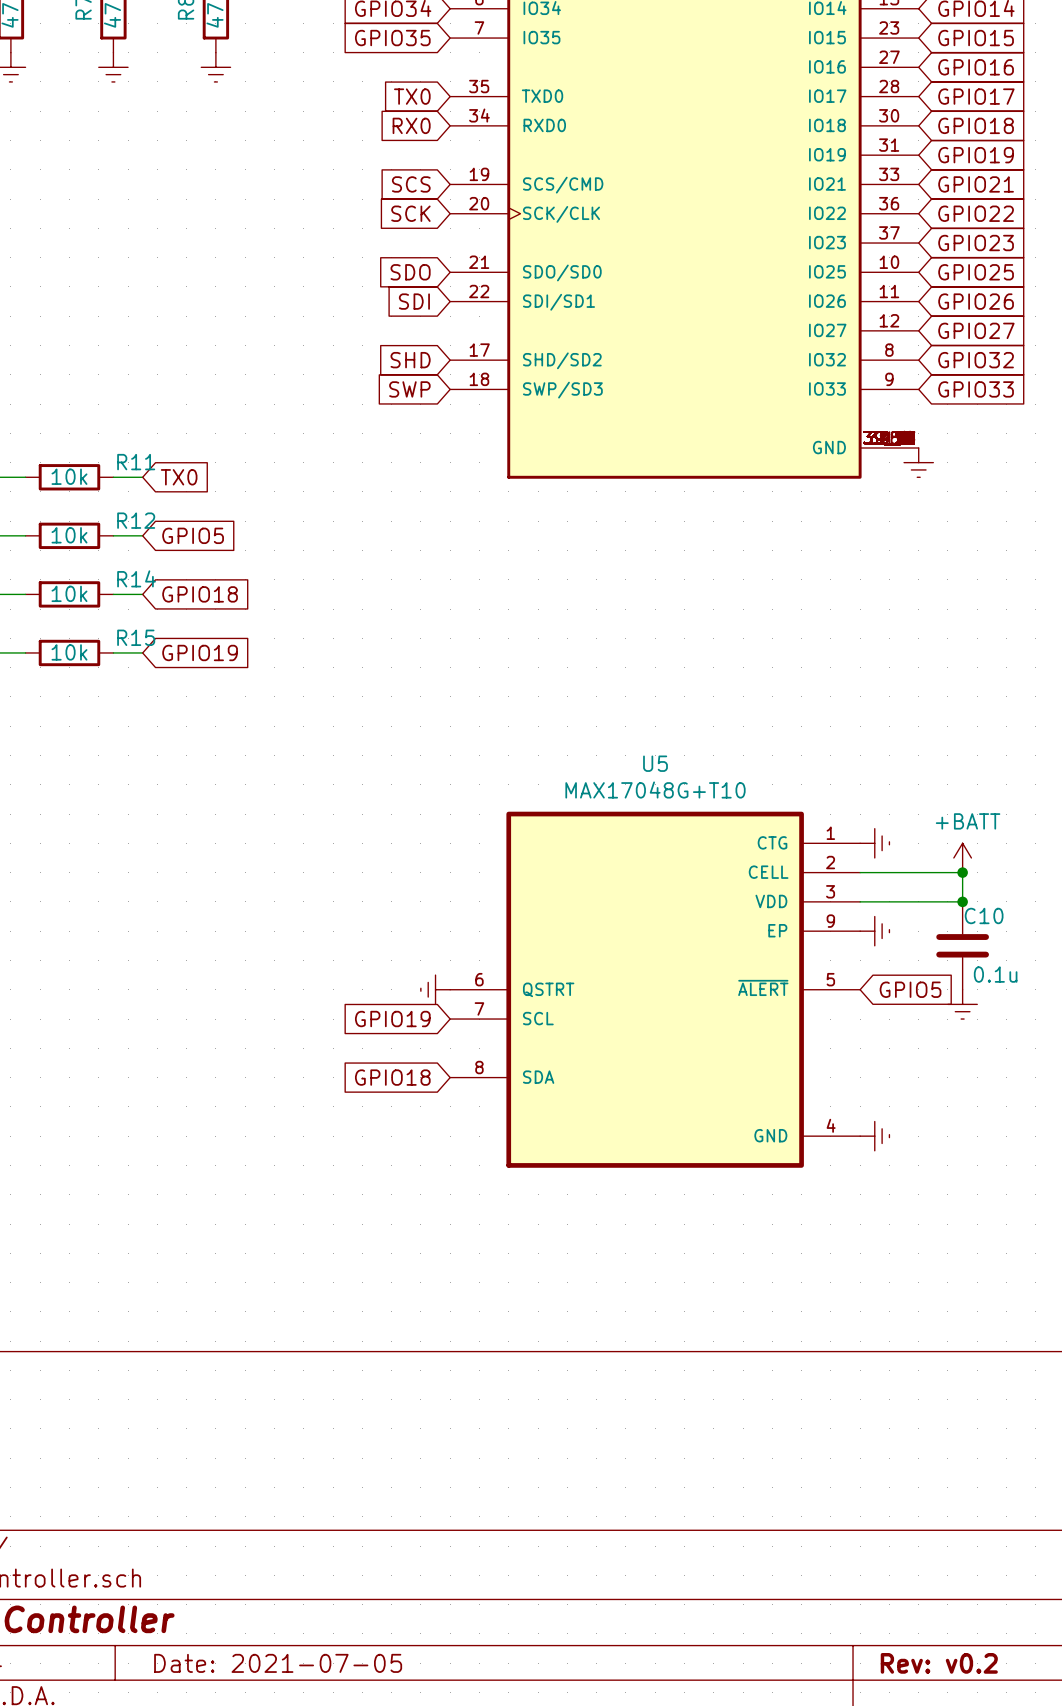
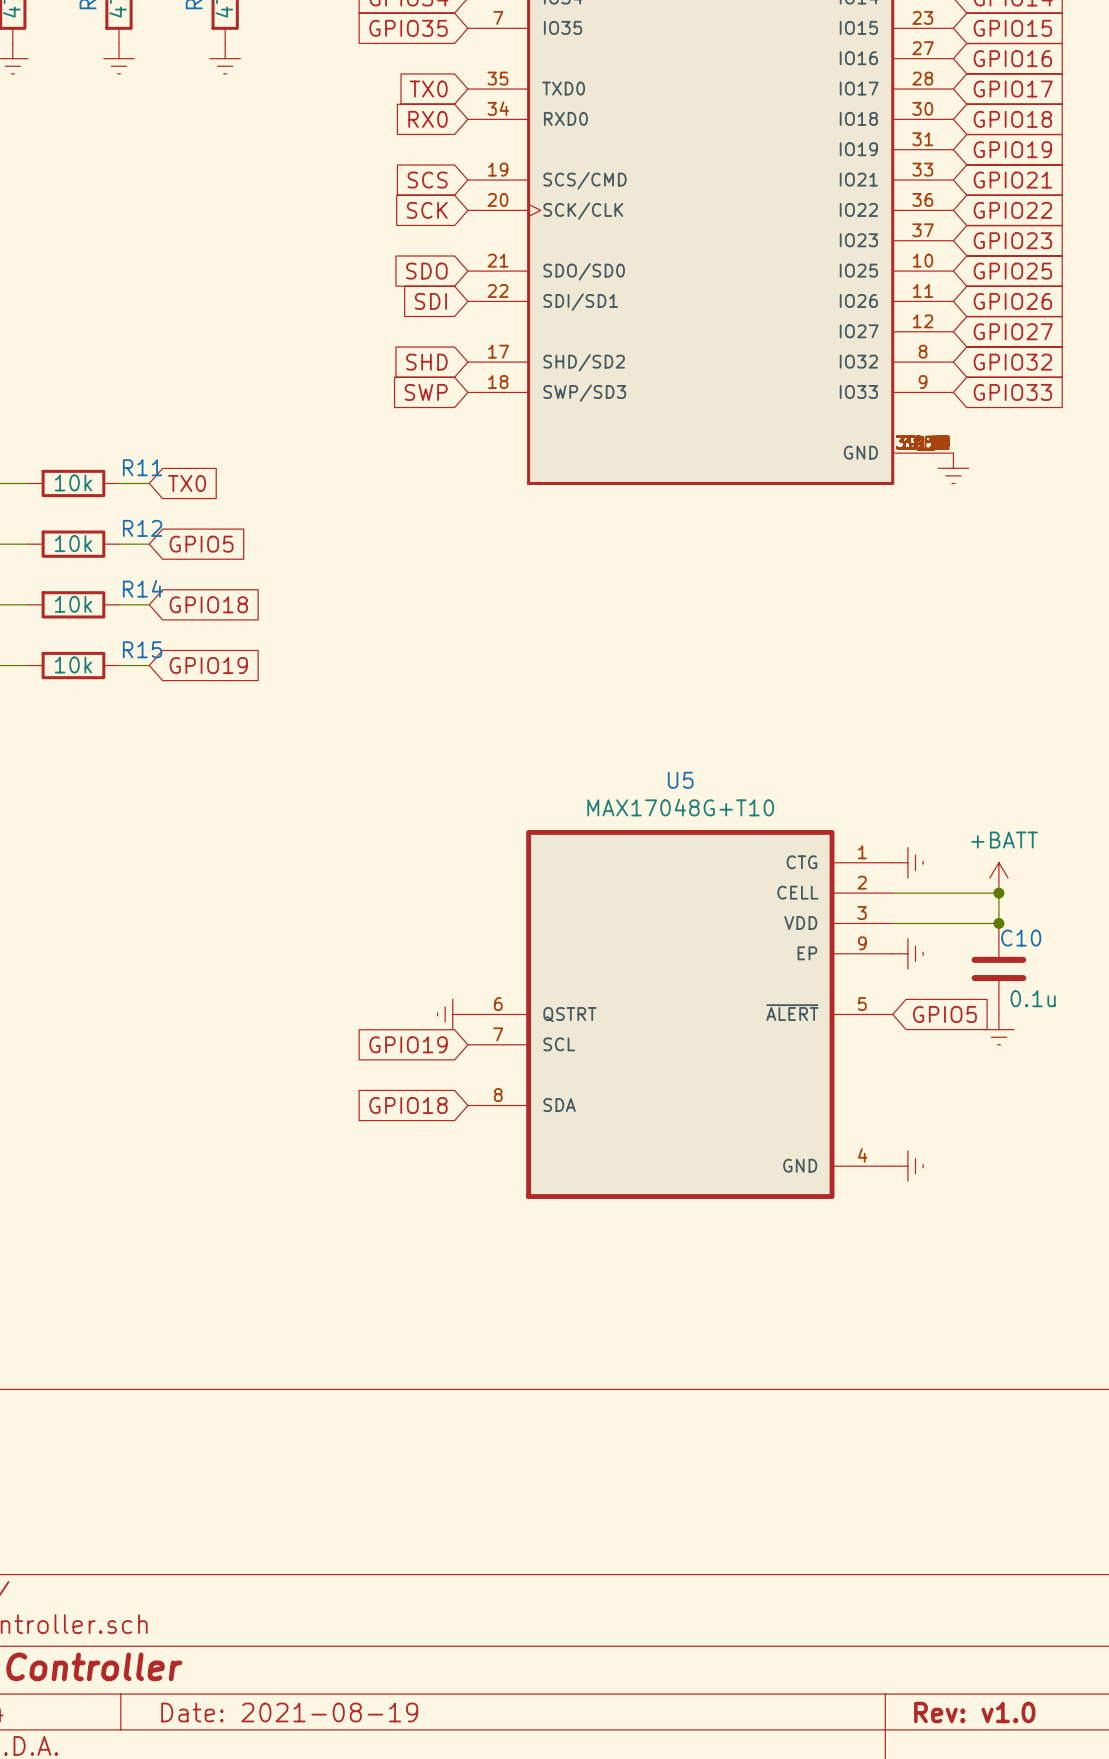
title block: Date: 2021-07-05 (278, 1663) -> Date: 2021-08-19 (289, 1712)
title block: Rev: v0.2 (939, 1663) -> Rev: v1.0 (974, 1712)

